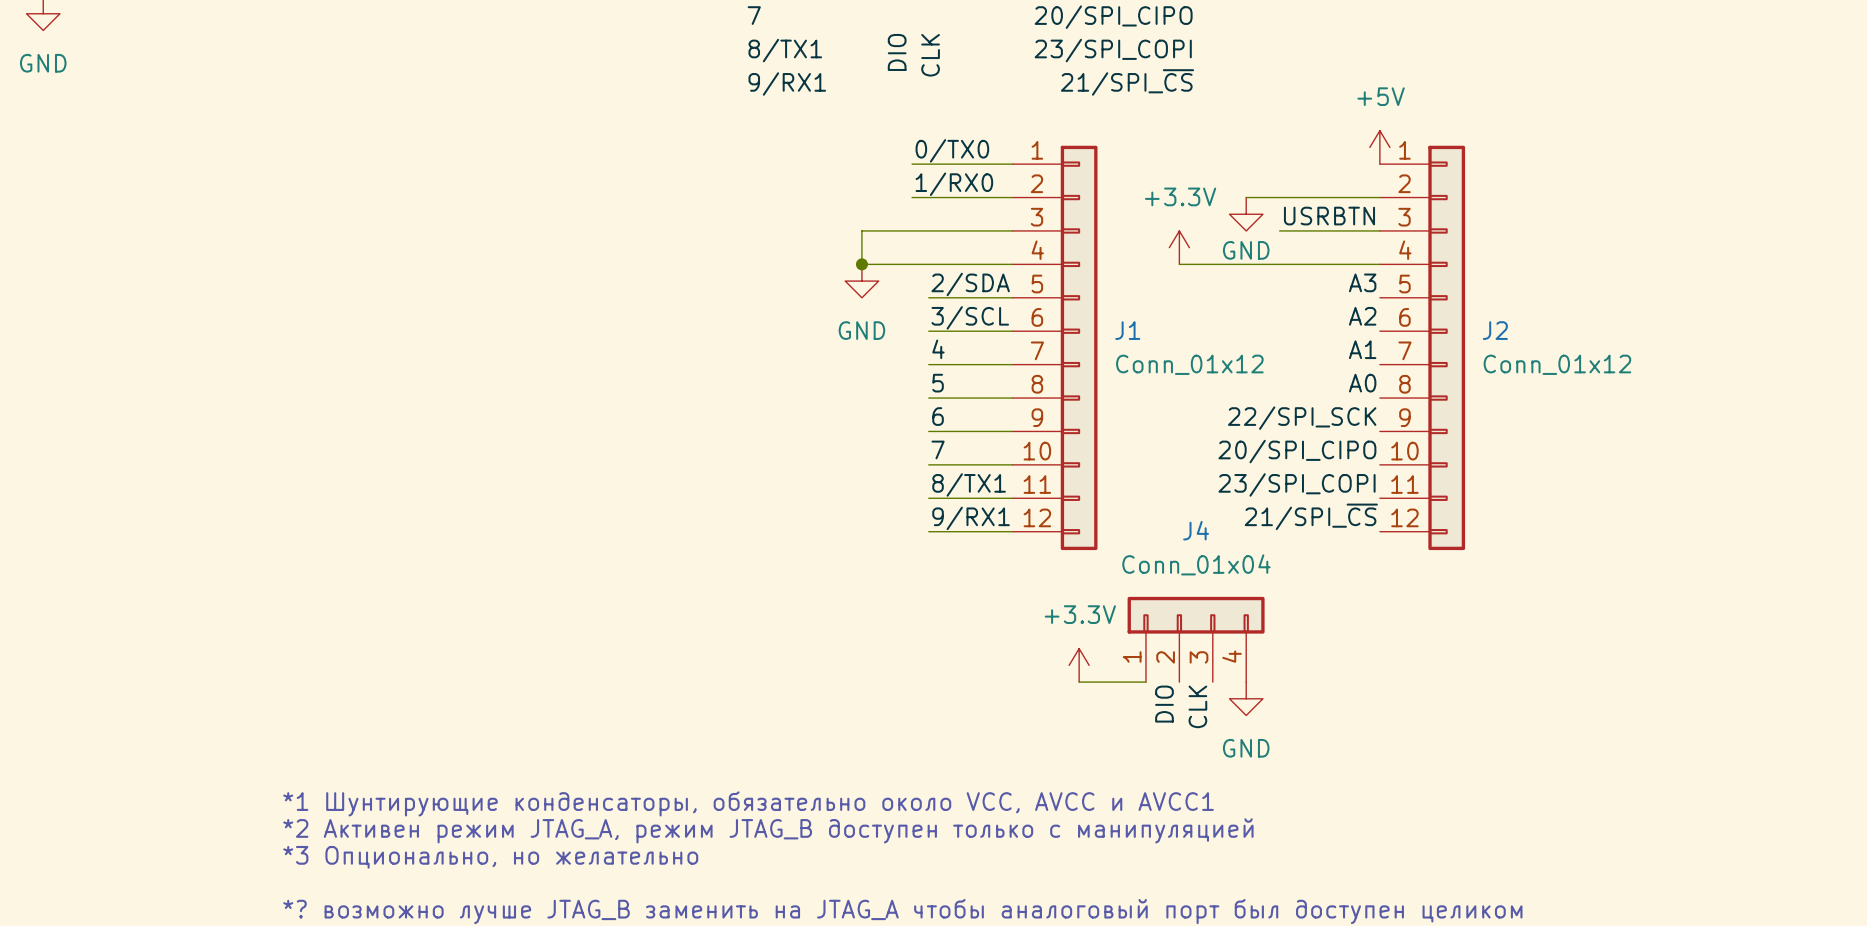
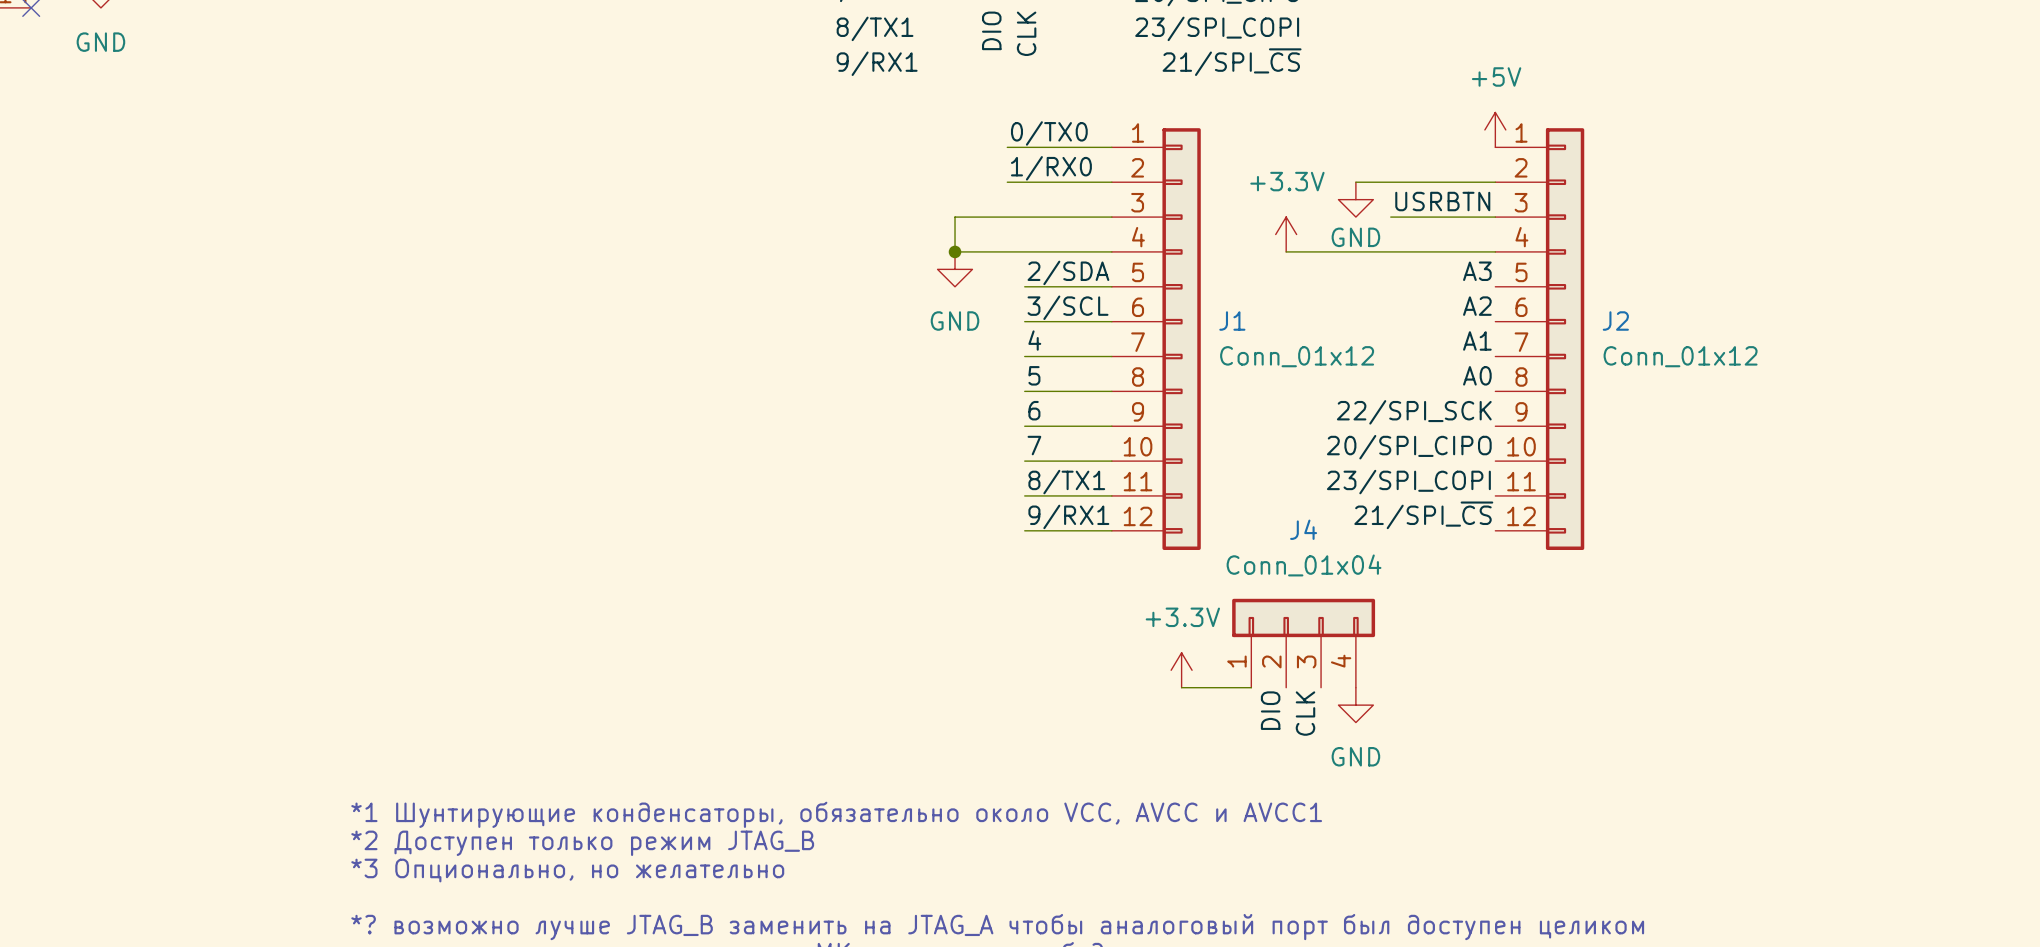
text: *2 Активен режим JTAG_A, режим JTAG_B доступен только с манипуляцией (768, 830) -> *2 Доступен только режим JTAG_B (582, 843)

